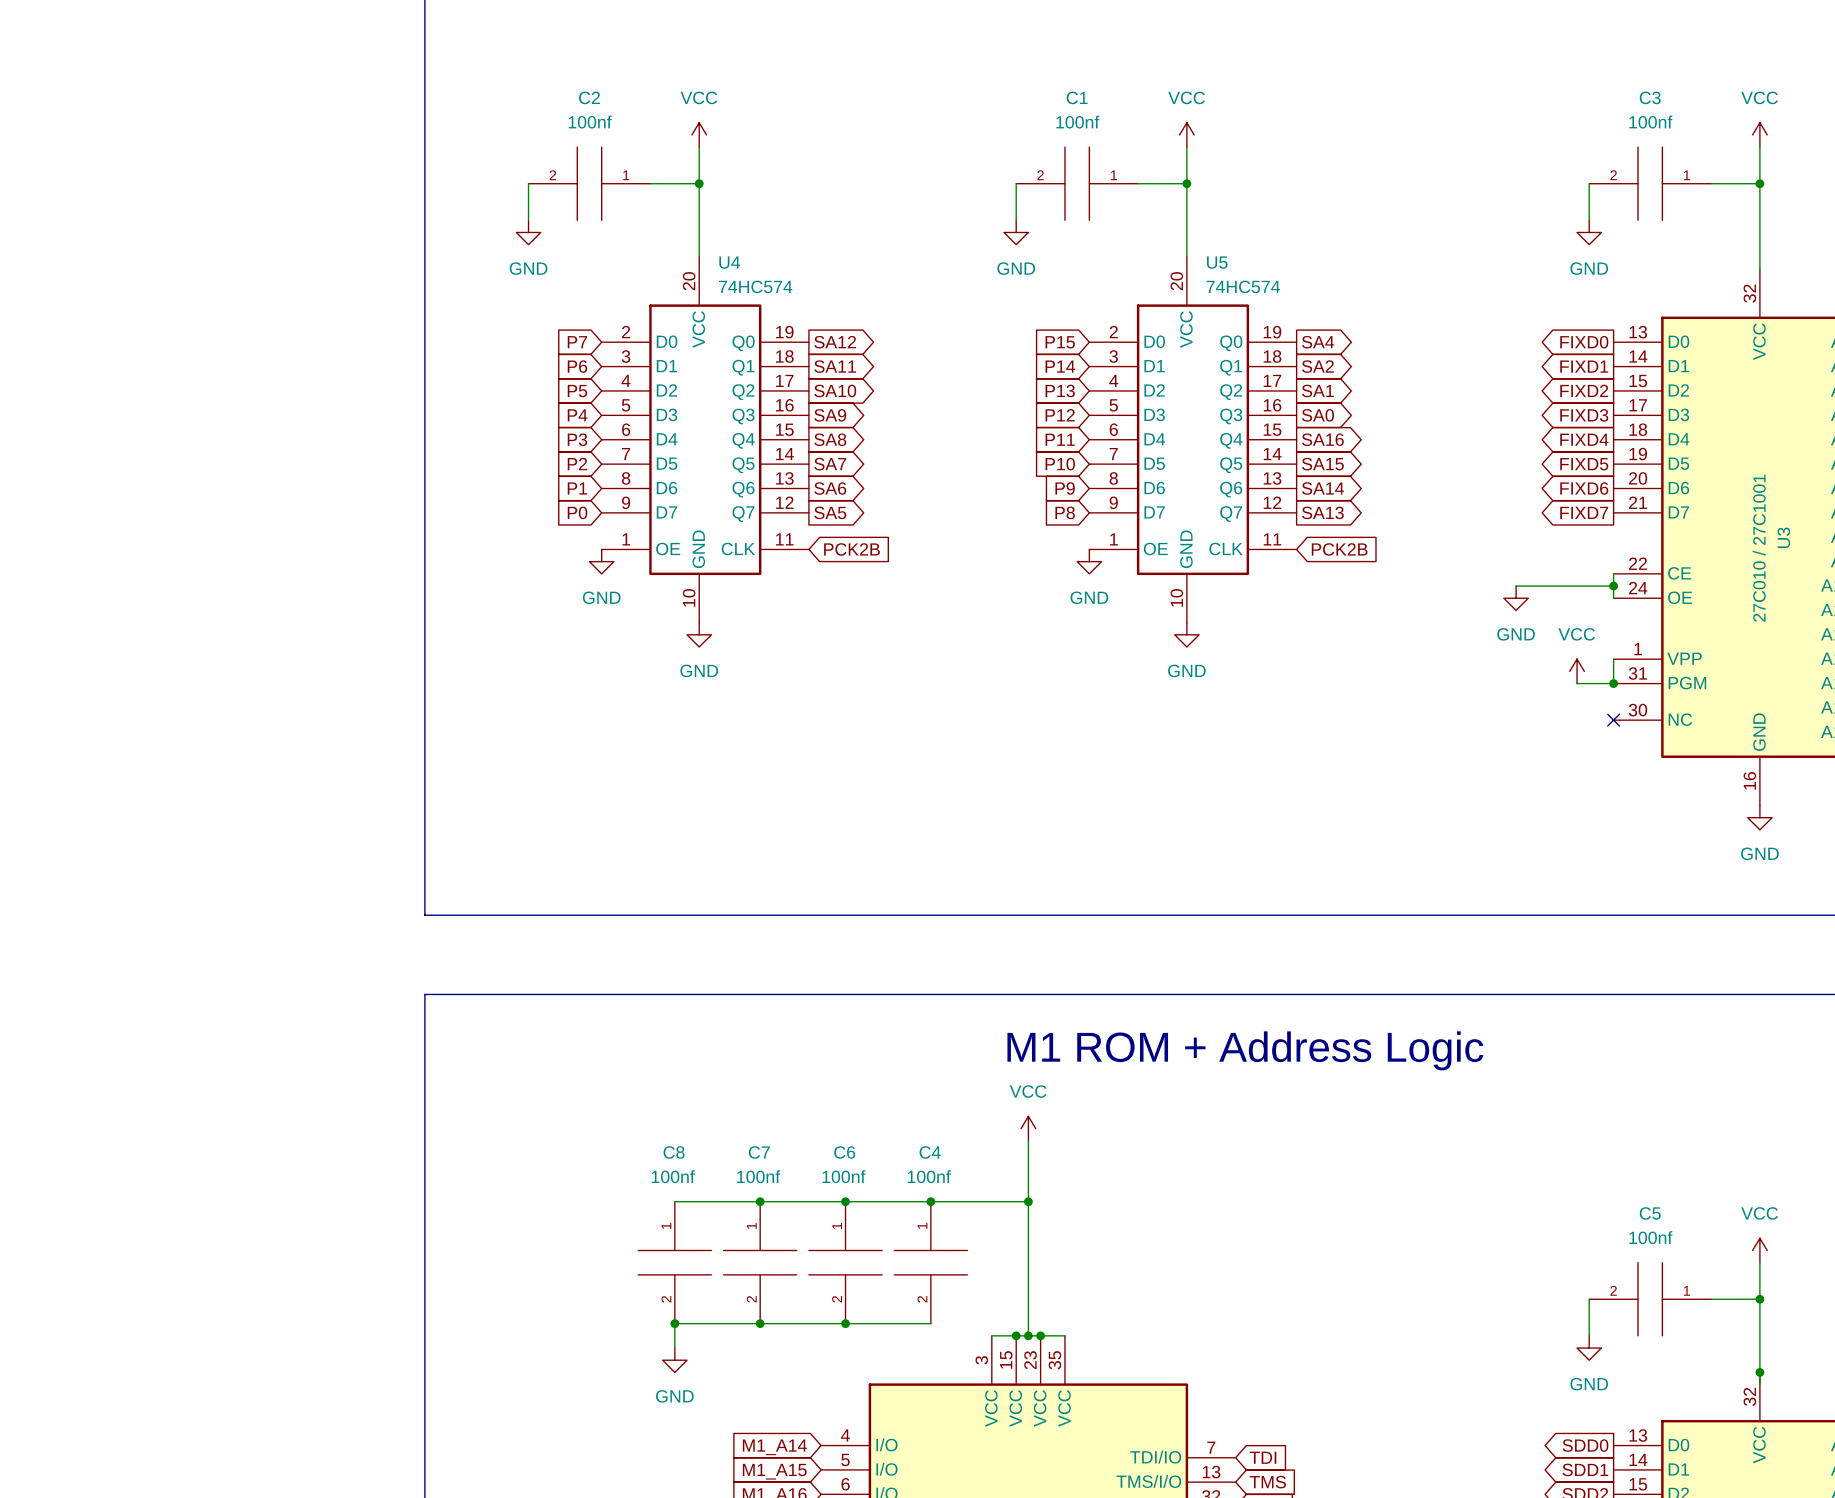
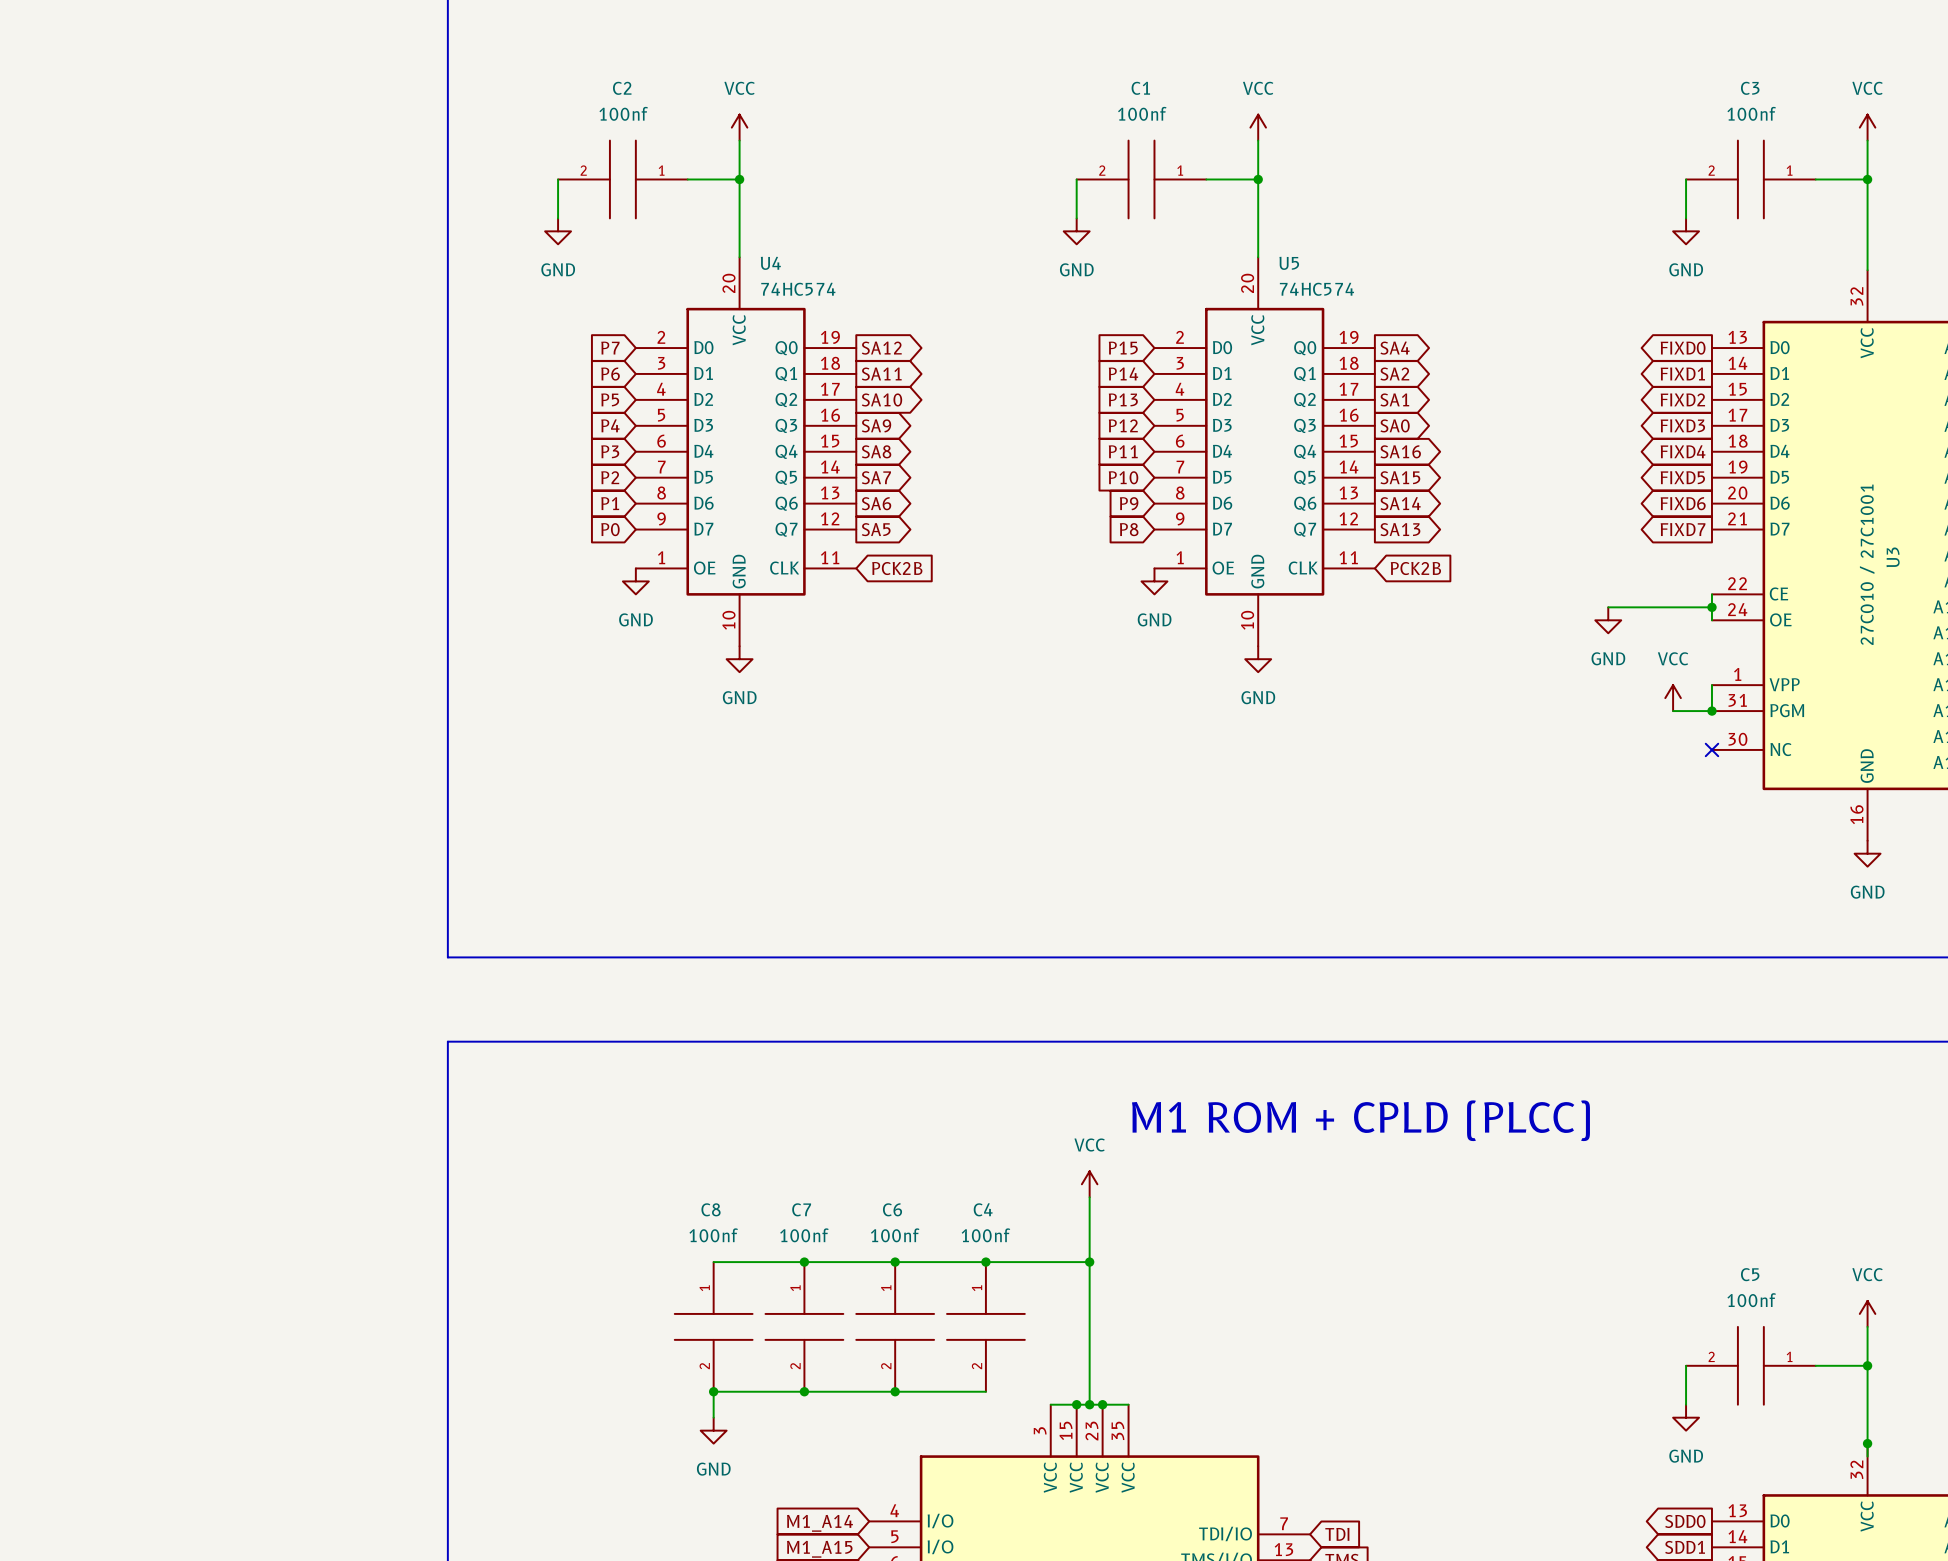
text: M1 ROM + Address Logic (1245, 1050) -> none
text: none -> M1 ROM + CPLD (PLCC) (1360, 1120)

